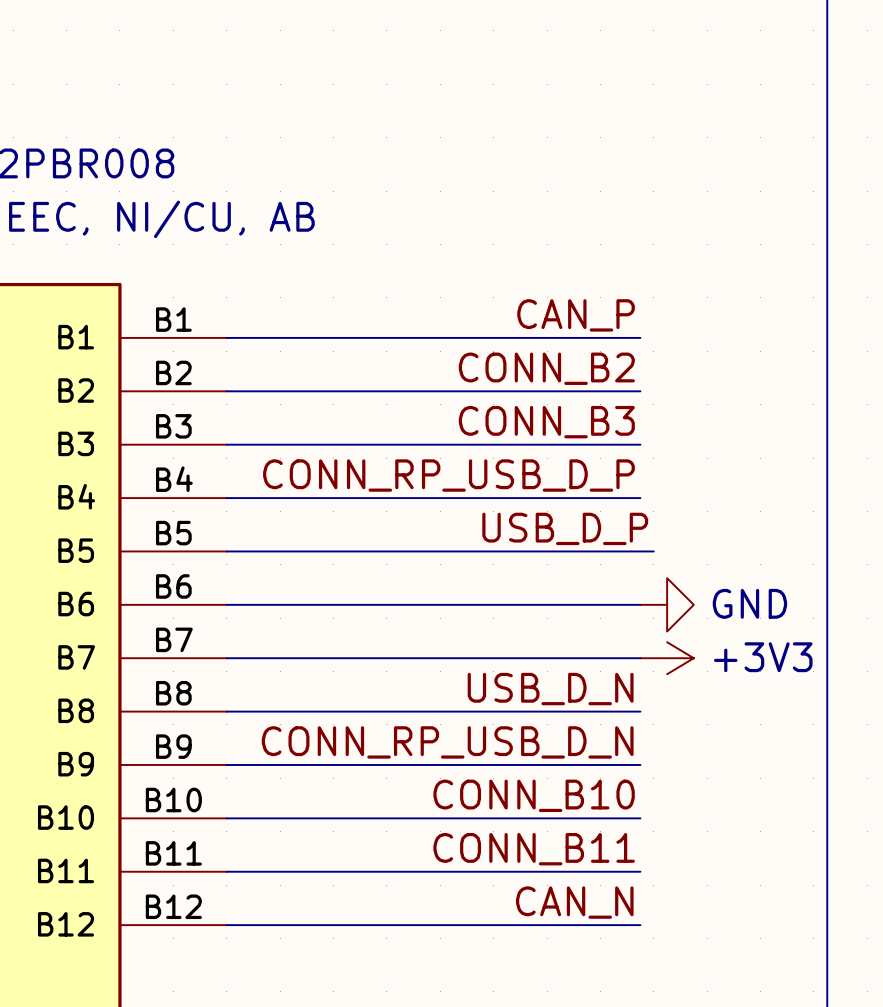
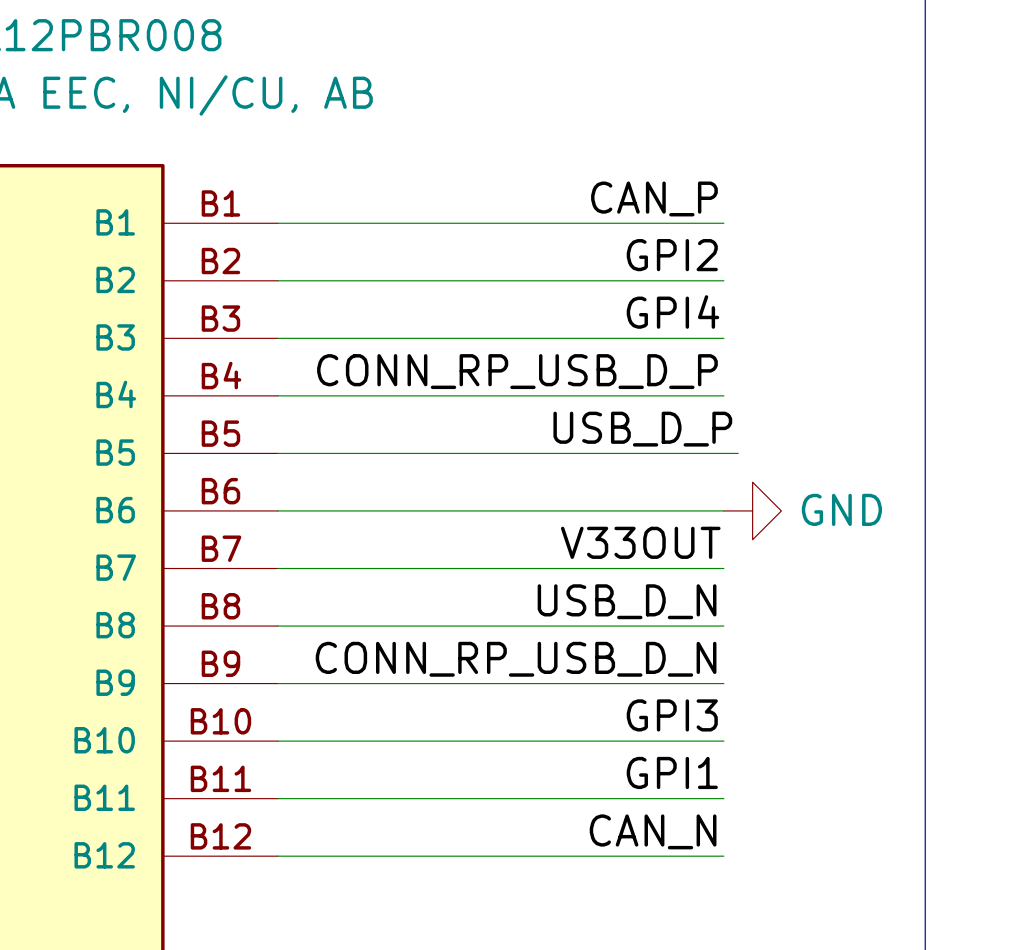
label: CONN_B2 (546, 368) -> GPI2 (672, 255)
label: CONN_B3 (546, 422) -> GPI4 (672, 311)
label: none -> V33OUT (640, 542)
power symbol: +3V3 (667, 658) -> none
label: CONN_B10 (534, 795) -> GPI3 (672, 715)
label: CONN_B11 (534, 849) -> GPI1 (672, 772)

